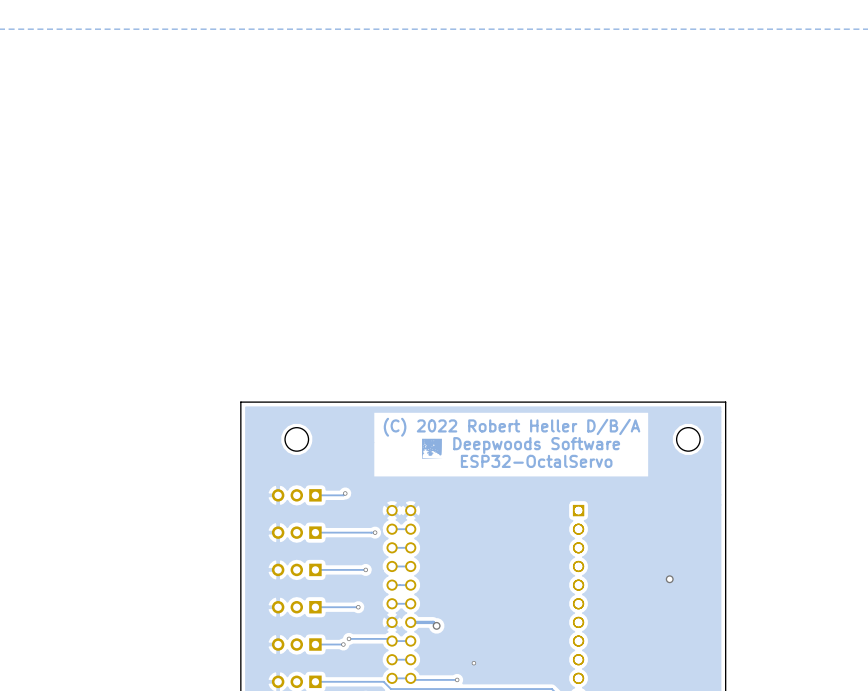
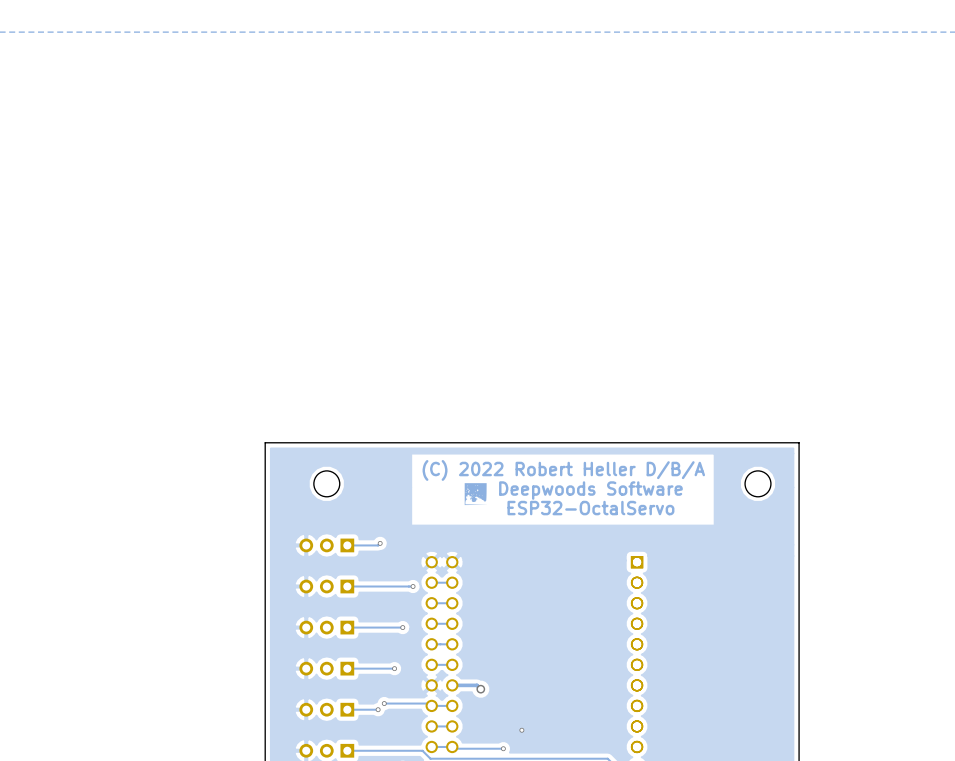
via: (669, 579) -> none

